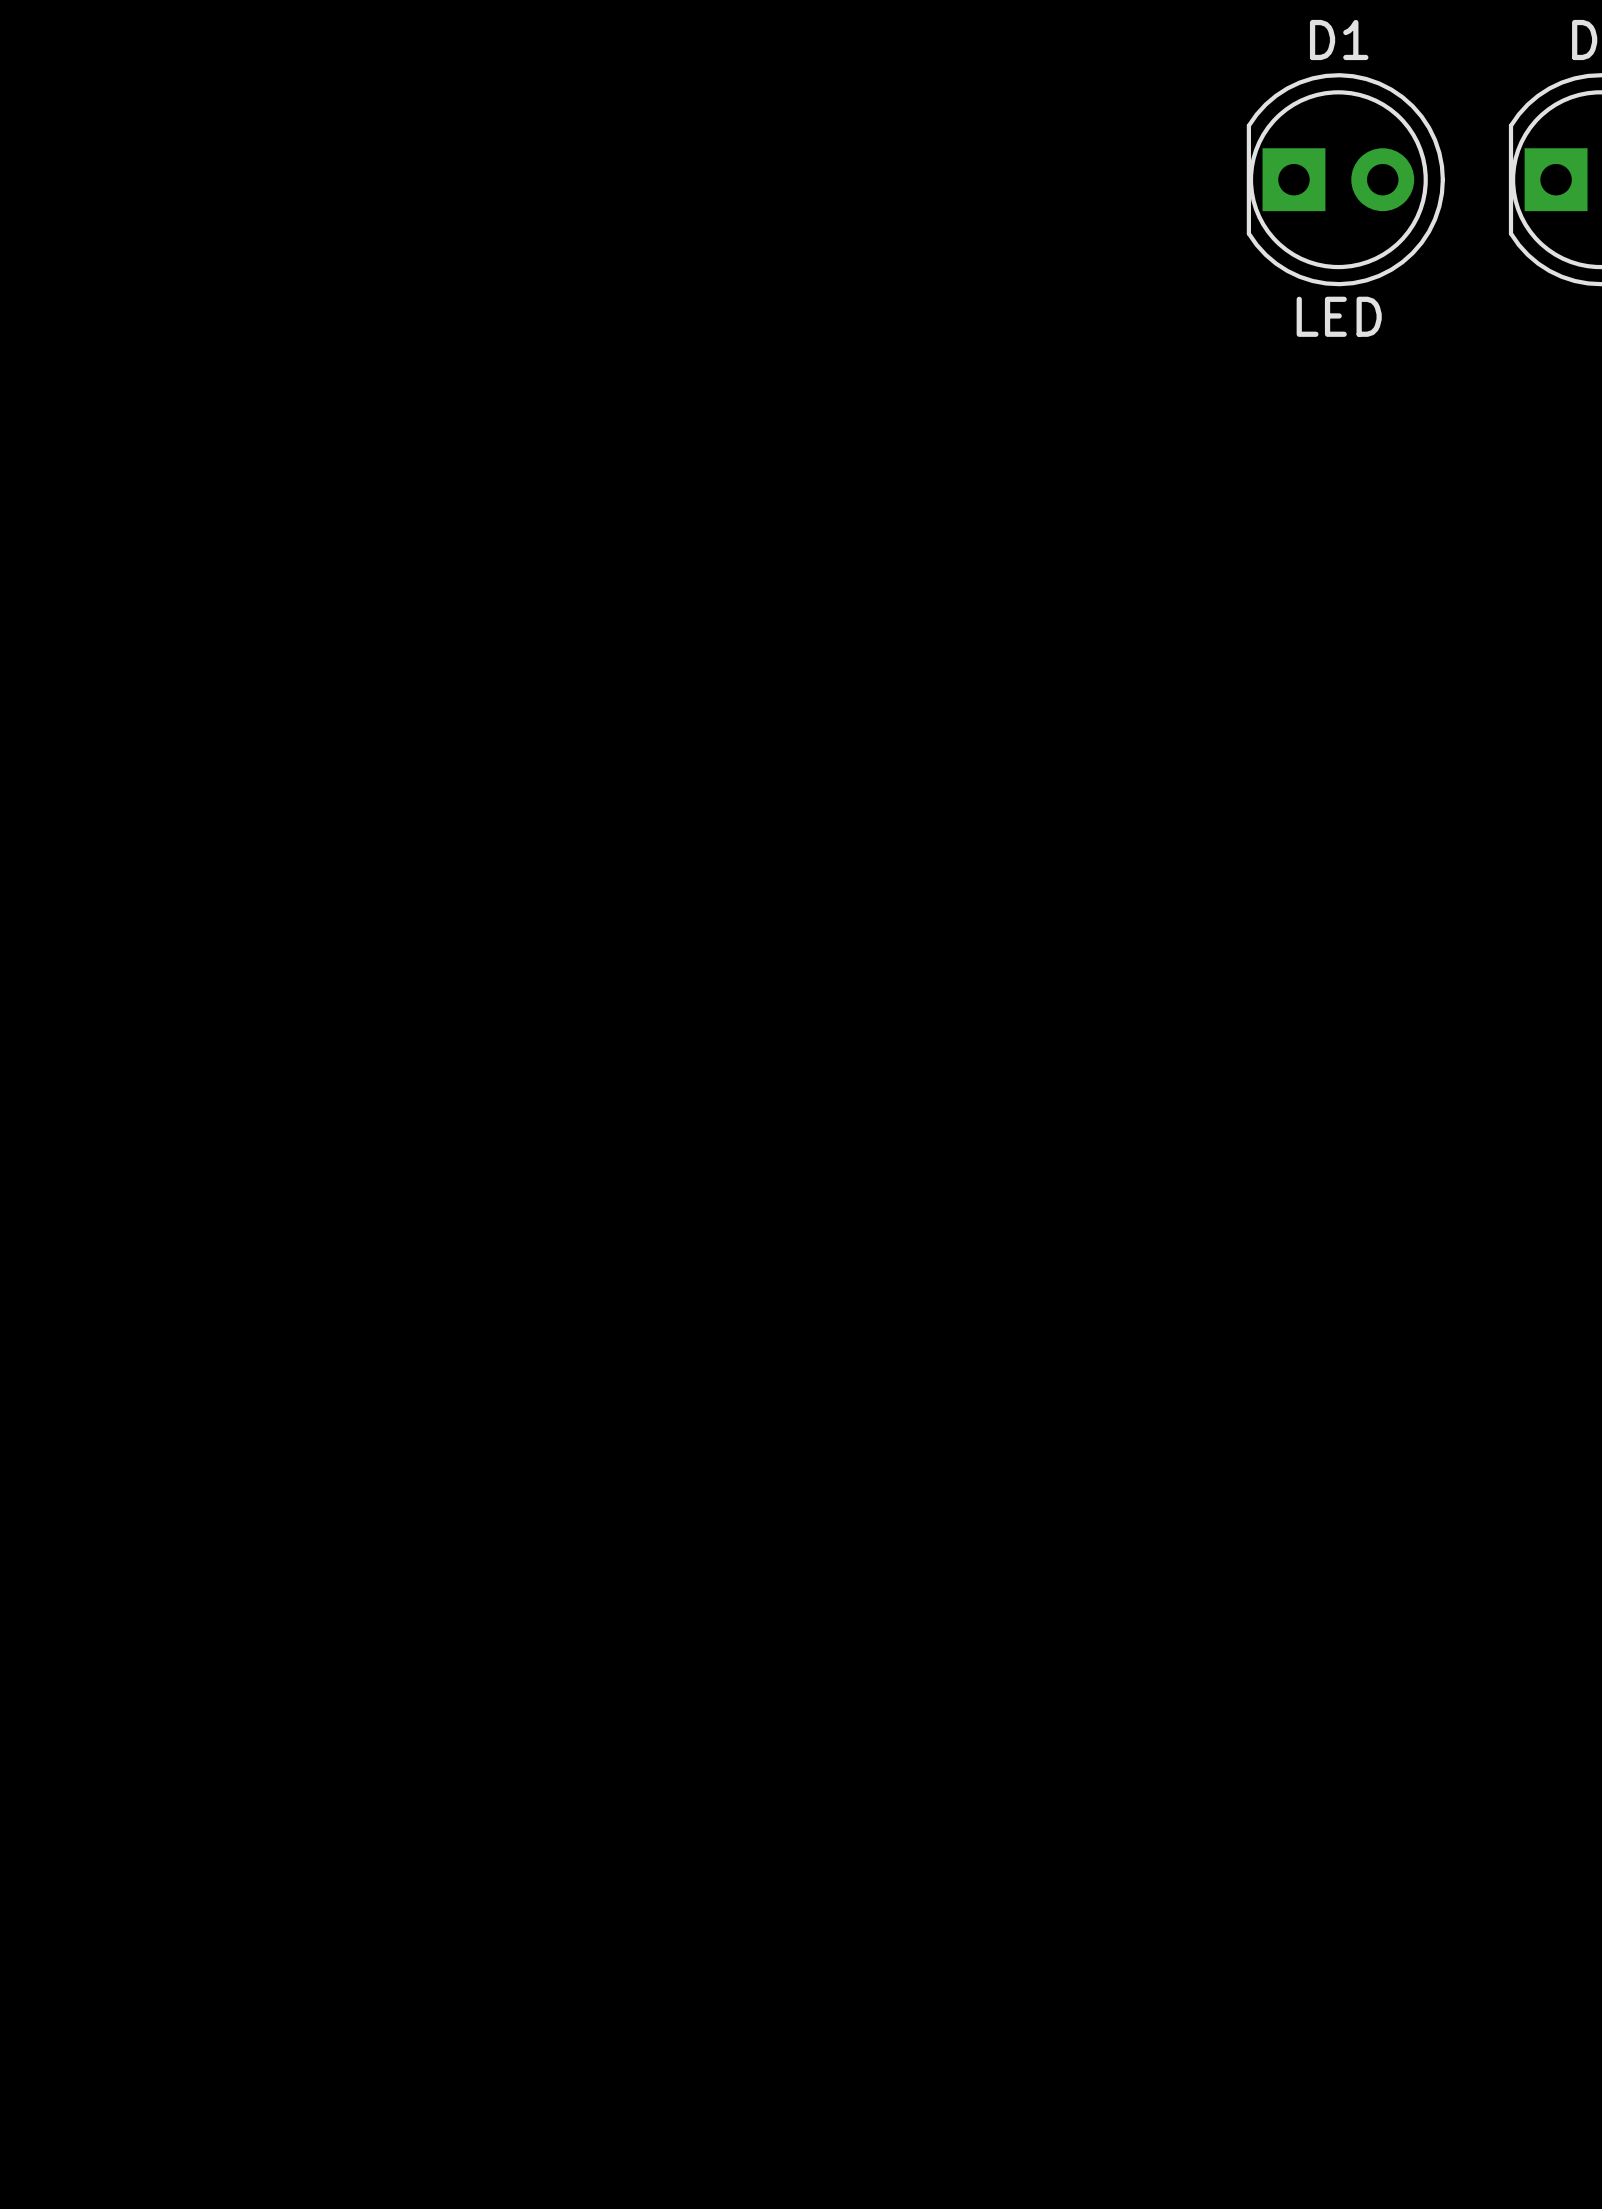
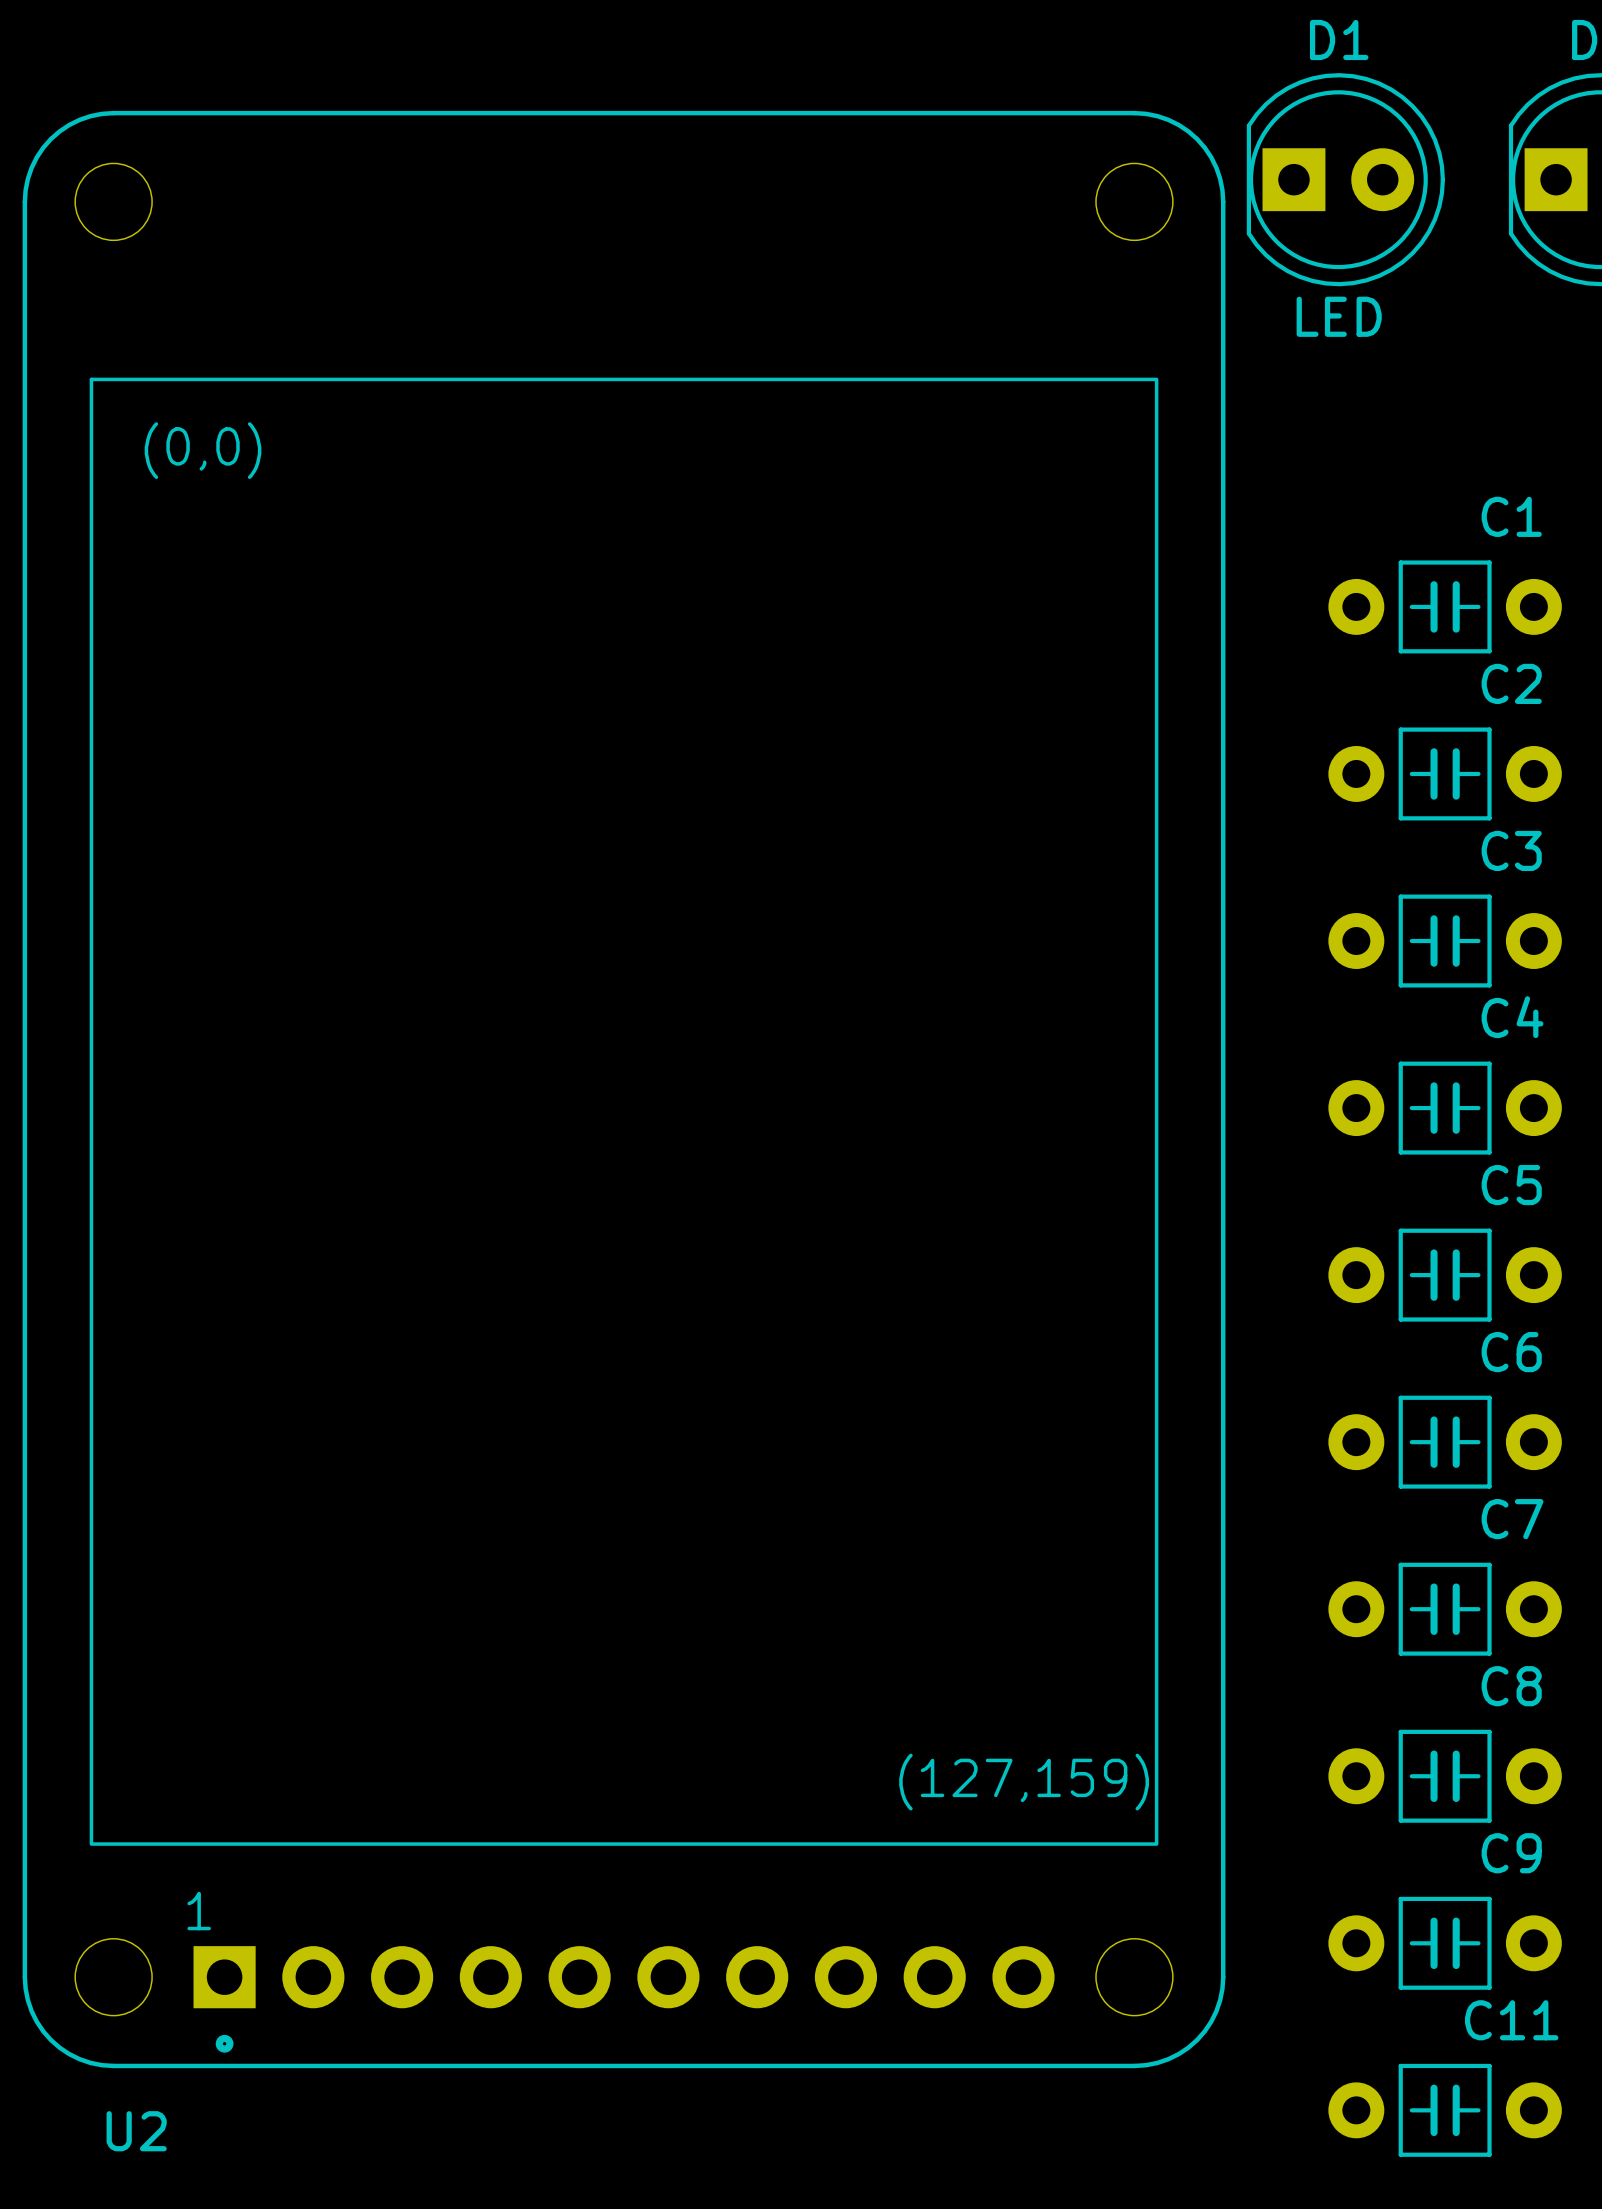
C1: none -> (1445, 606)
C2: none -> (1445, 773)
C3: none -> (1445, 941)
U2: none -> (624, 1089)
C4: none -> (1445, 1108)
C5: none -> (1445, 1275)
C6: none -> (1445, 1442)
C7: none -> (1445, 1609)
C8: none -> (1445, 1776)
C9: none -> (1445, 1943)
C11: none -> (1445, 2110)

